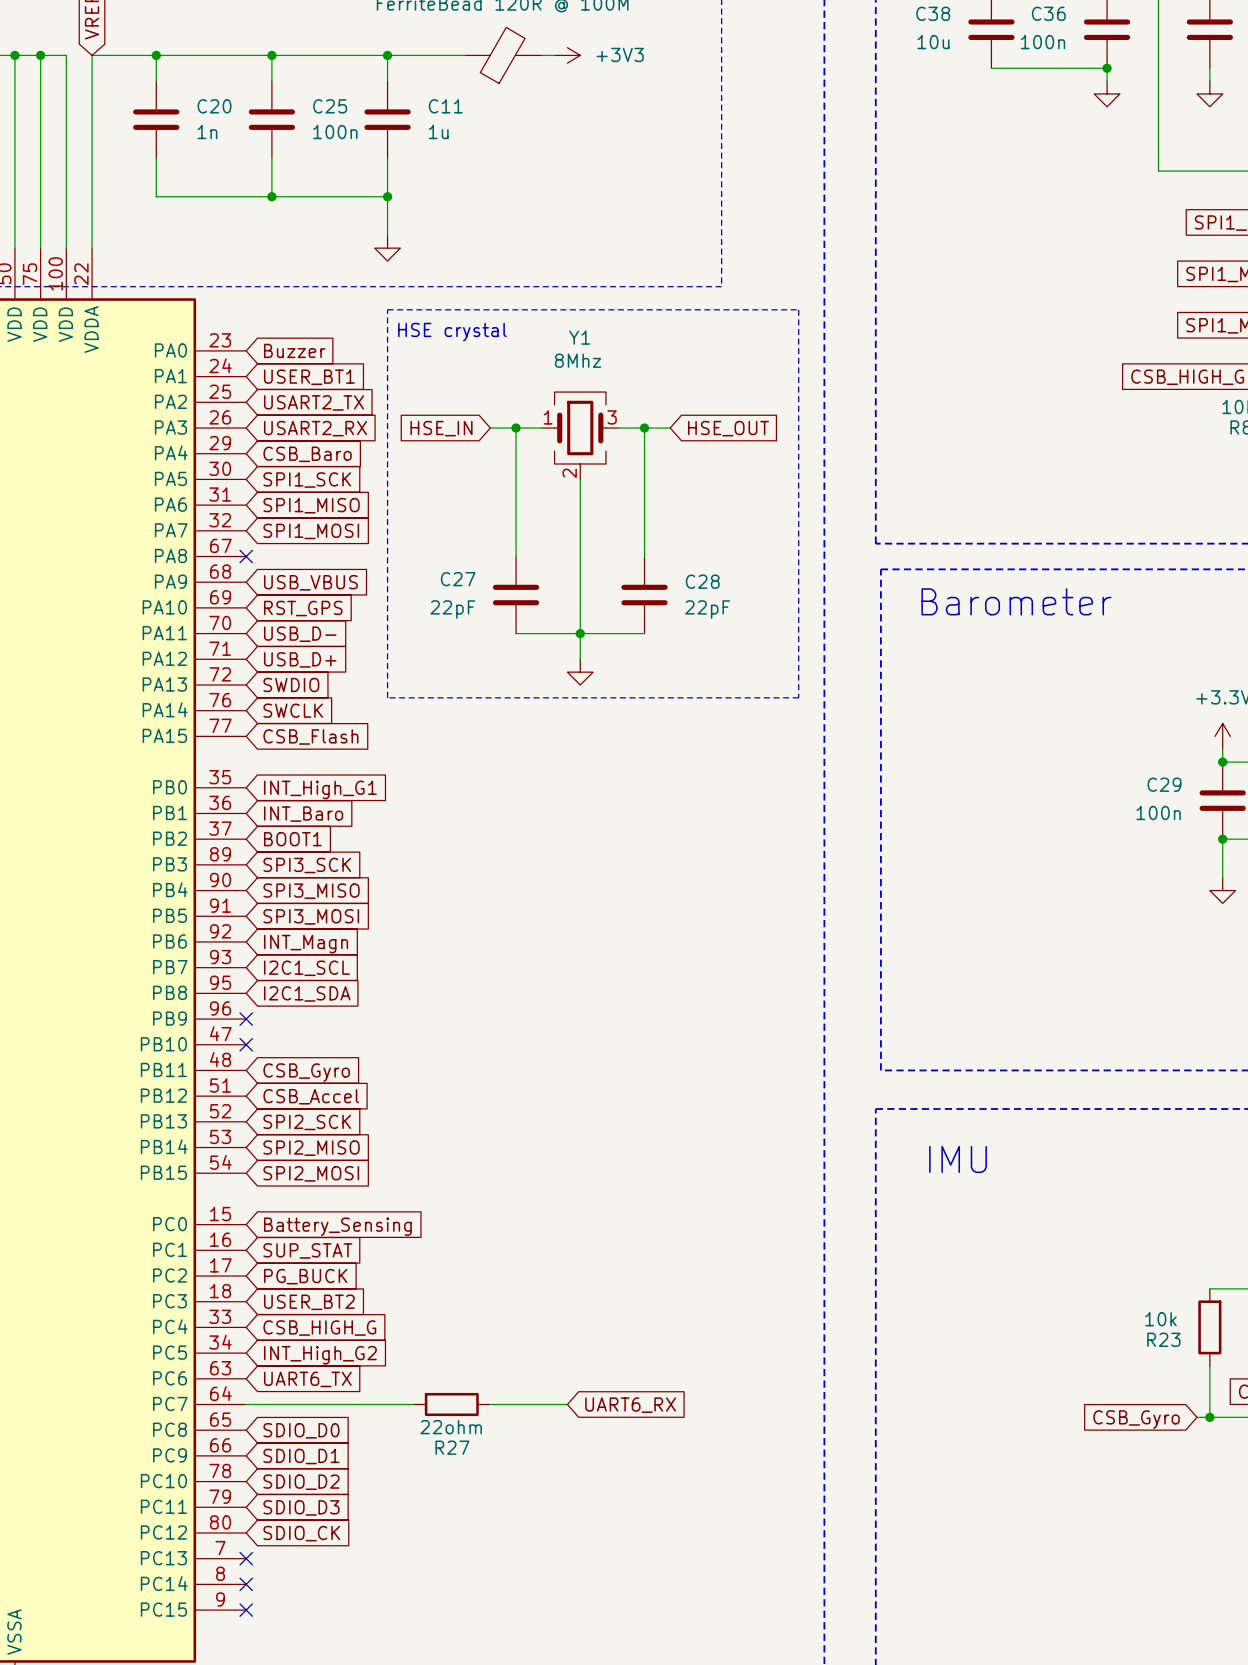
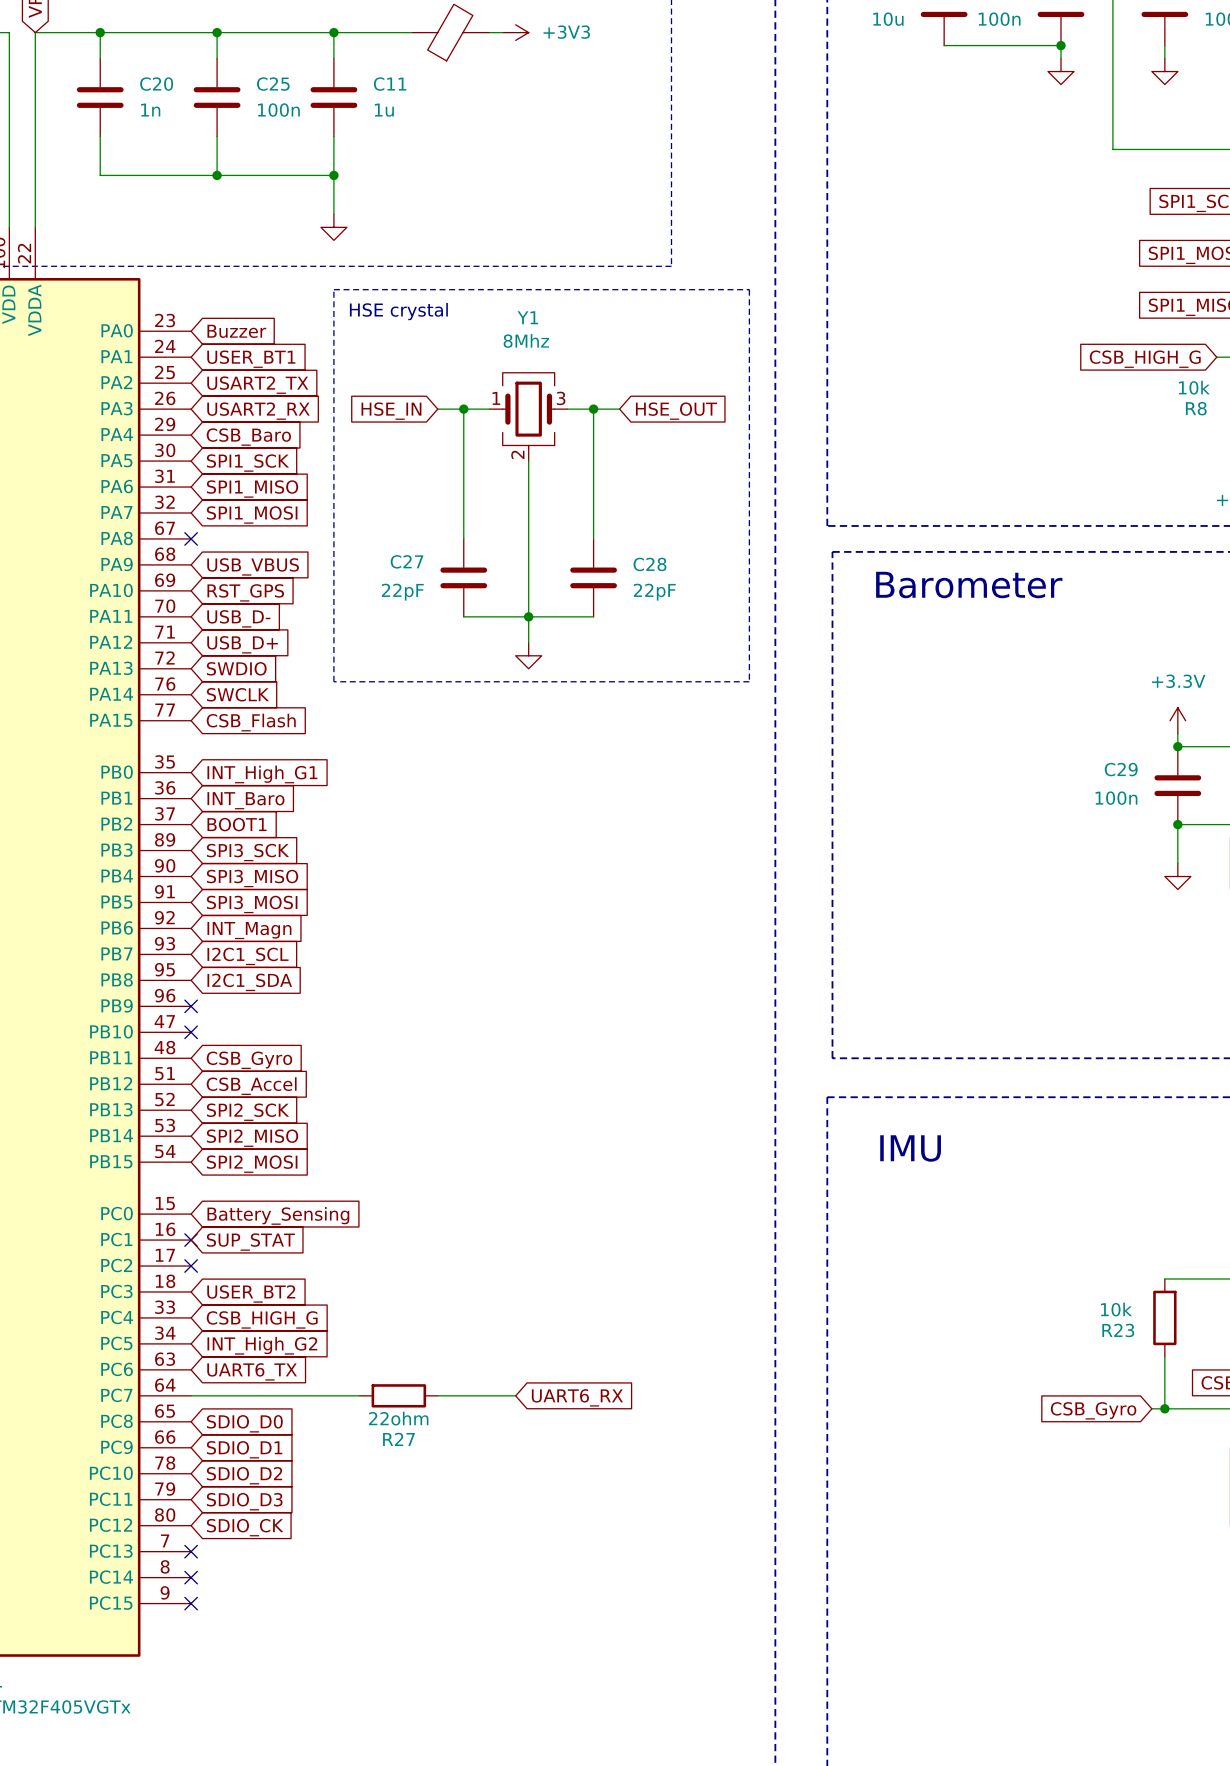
no-connect mark: none -> (191, 1240)
no-connect mark: none -> (191, 1266)
global label: PG_BUCK (305, 1276) -> none

